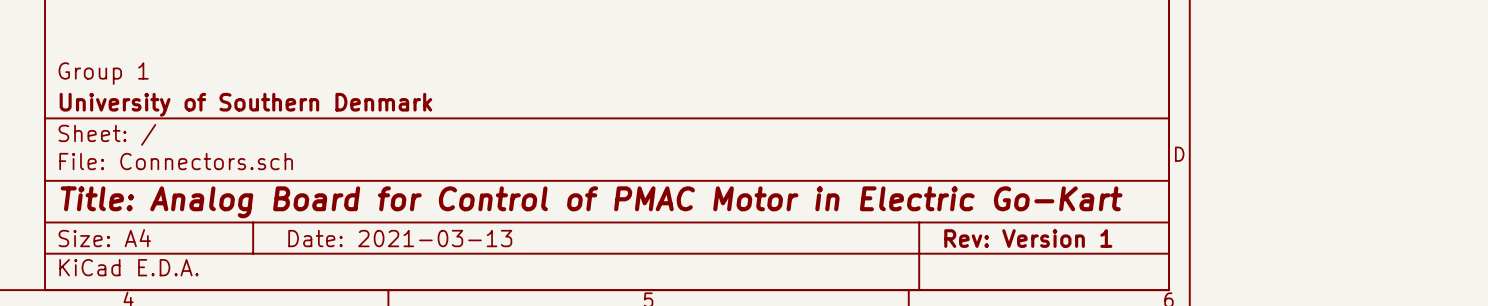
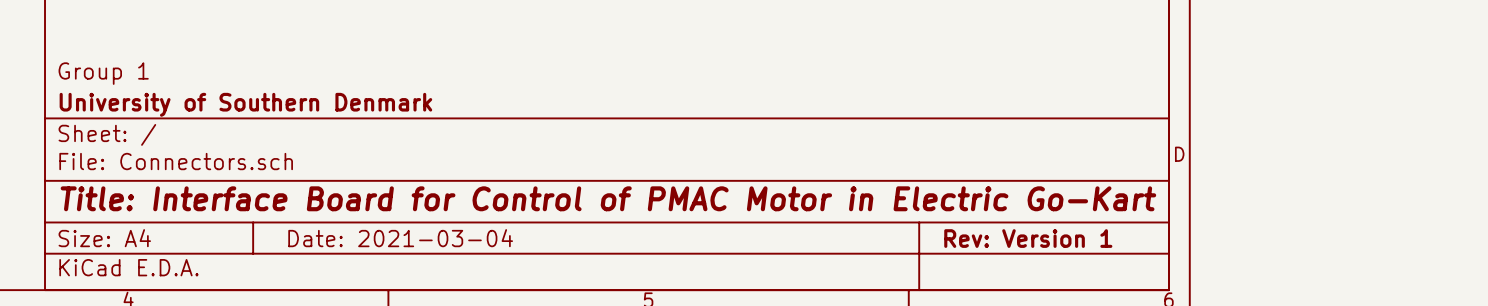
title block: Title: Analog Board for Control of PMAC Motor in Electric Go-Kart (591, 202) -> Title: Interface Board for Control of PMAC Motor in Electric Go-Kart (608, 198)
title block: Date: 2021-03-13 (400, 238) -> Date: 2021-03-04 (400, 238)

